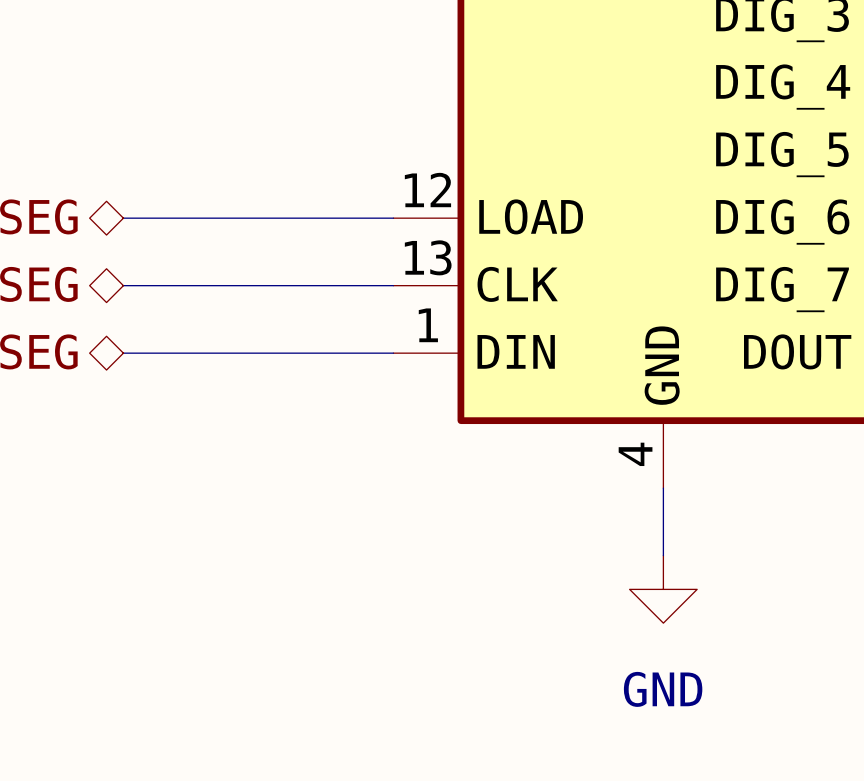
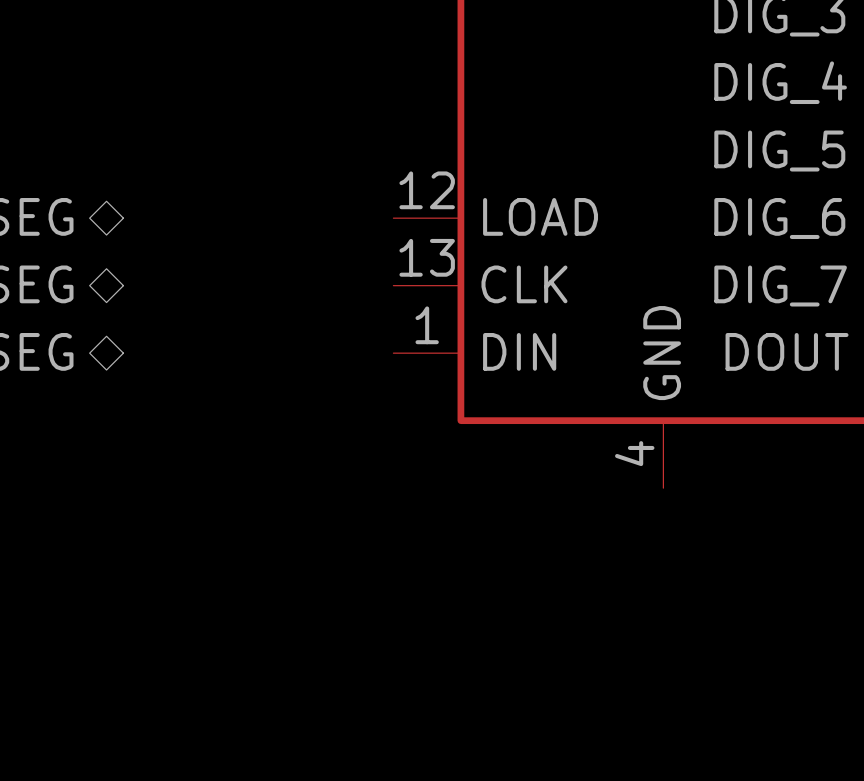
wire: (123, 218) (393, 218) -> none
wire: (123, 285) (393, 285) -> none
wire: (123, 353) (393, 353) -> none
wire: (663, 488) (663, 555) -> none
power symbol: GND (663, 589) -> none

